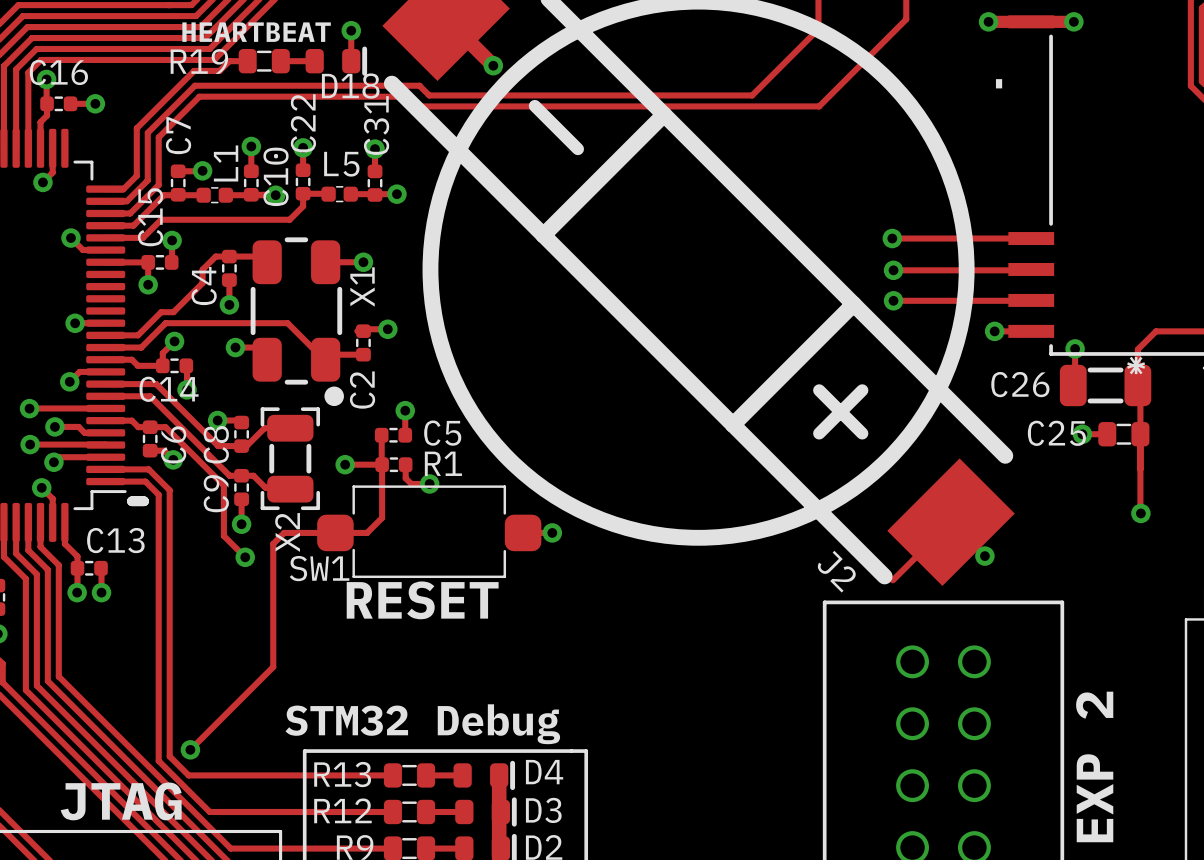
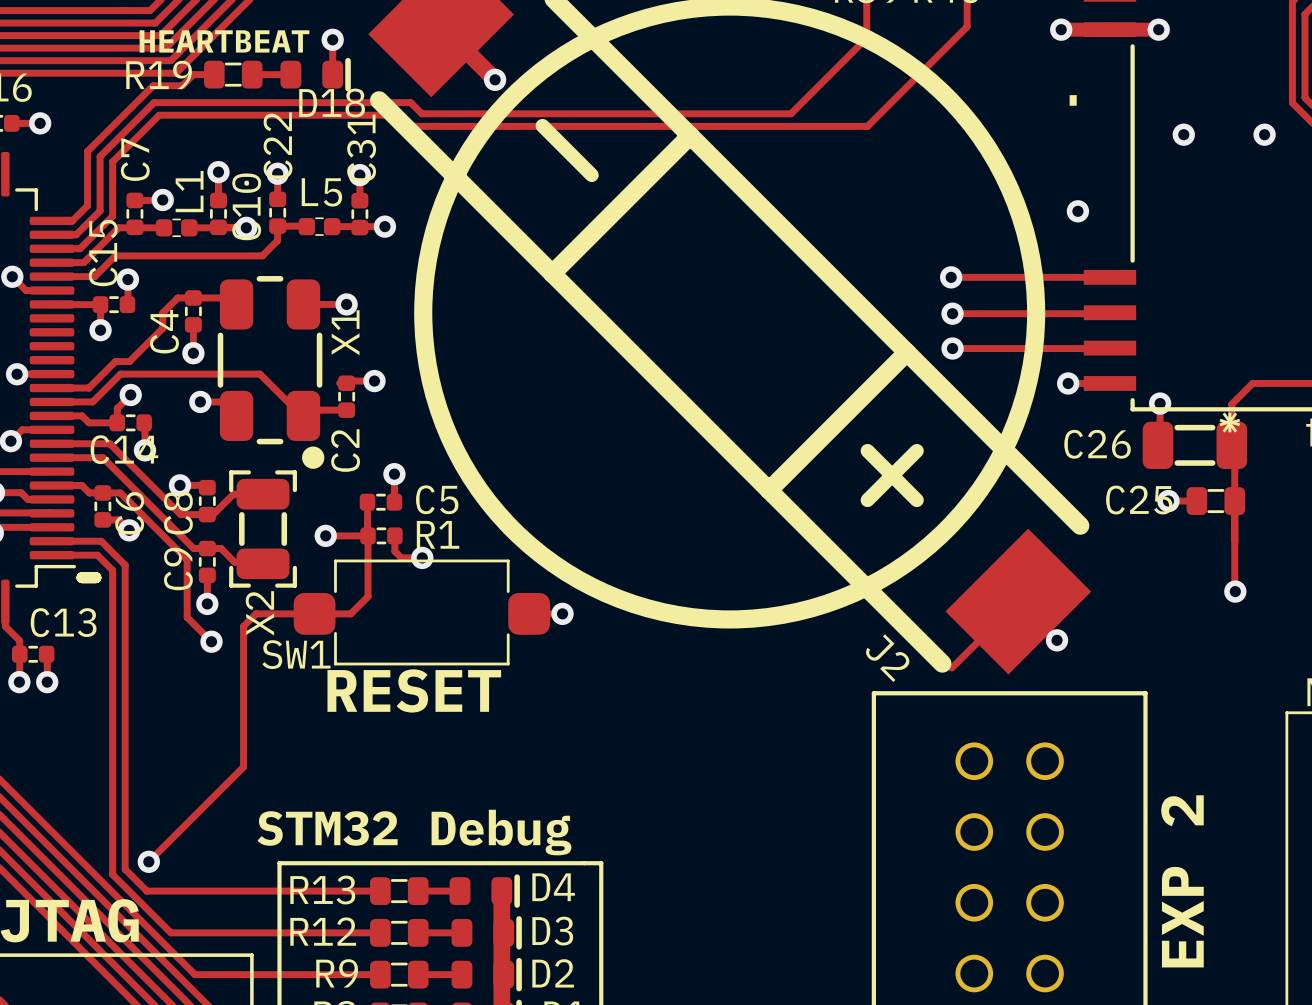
via: none -> (1183, 134)
via: none -> (1264, 134)
via: none -> (1077, 211)

